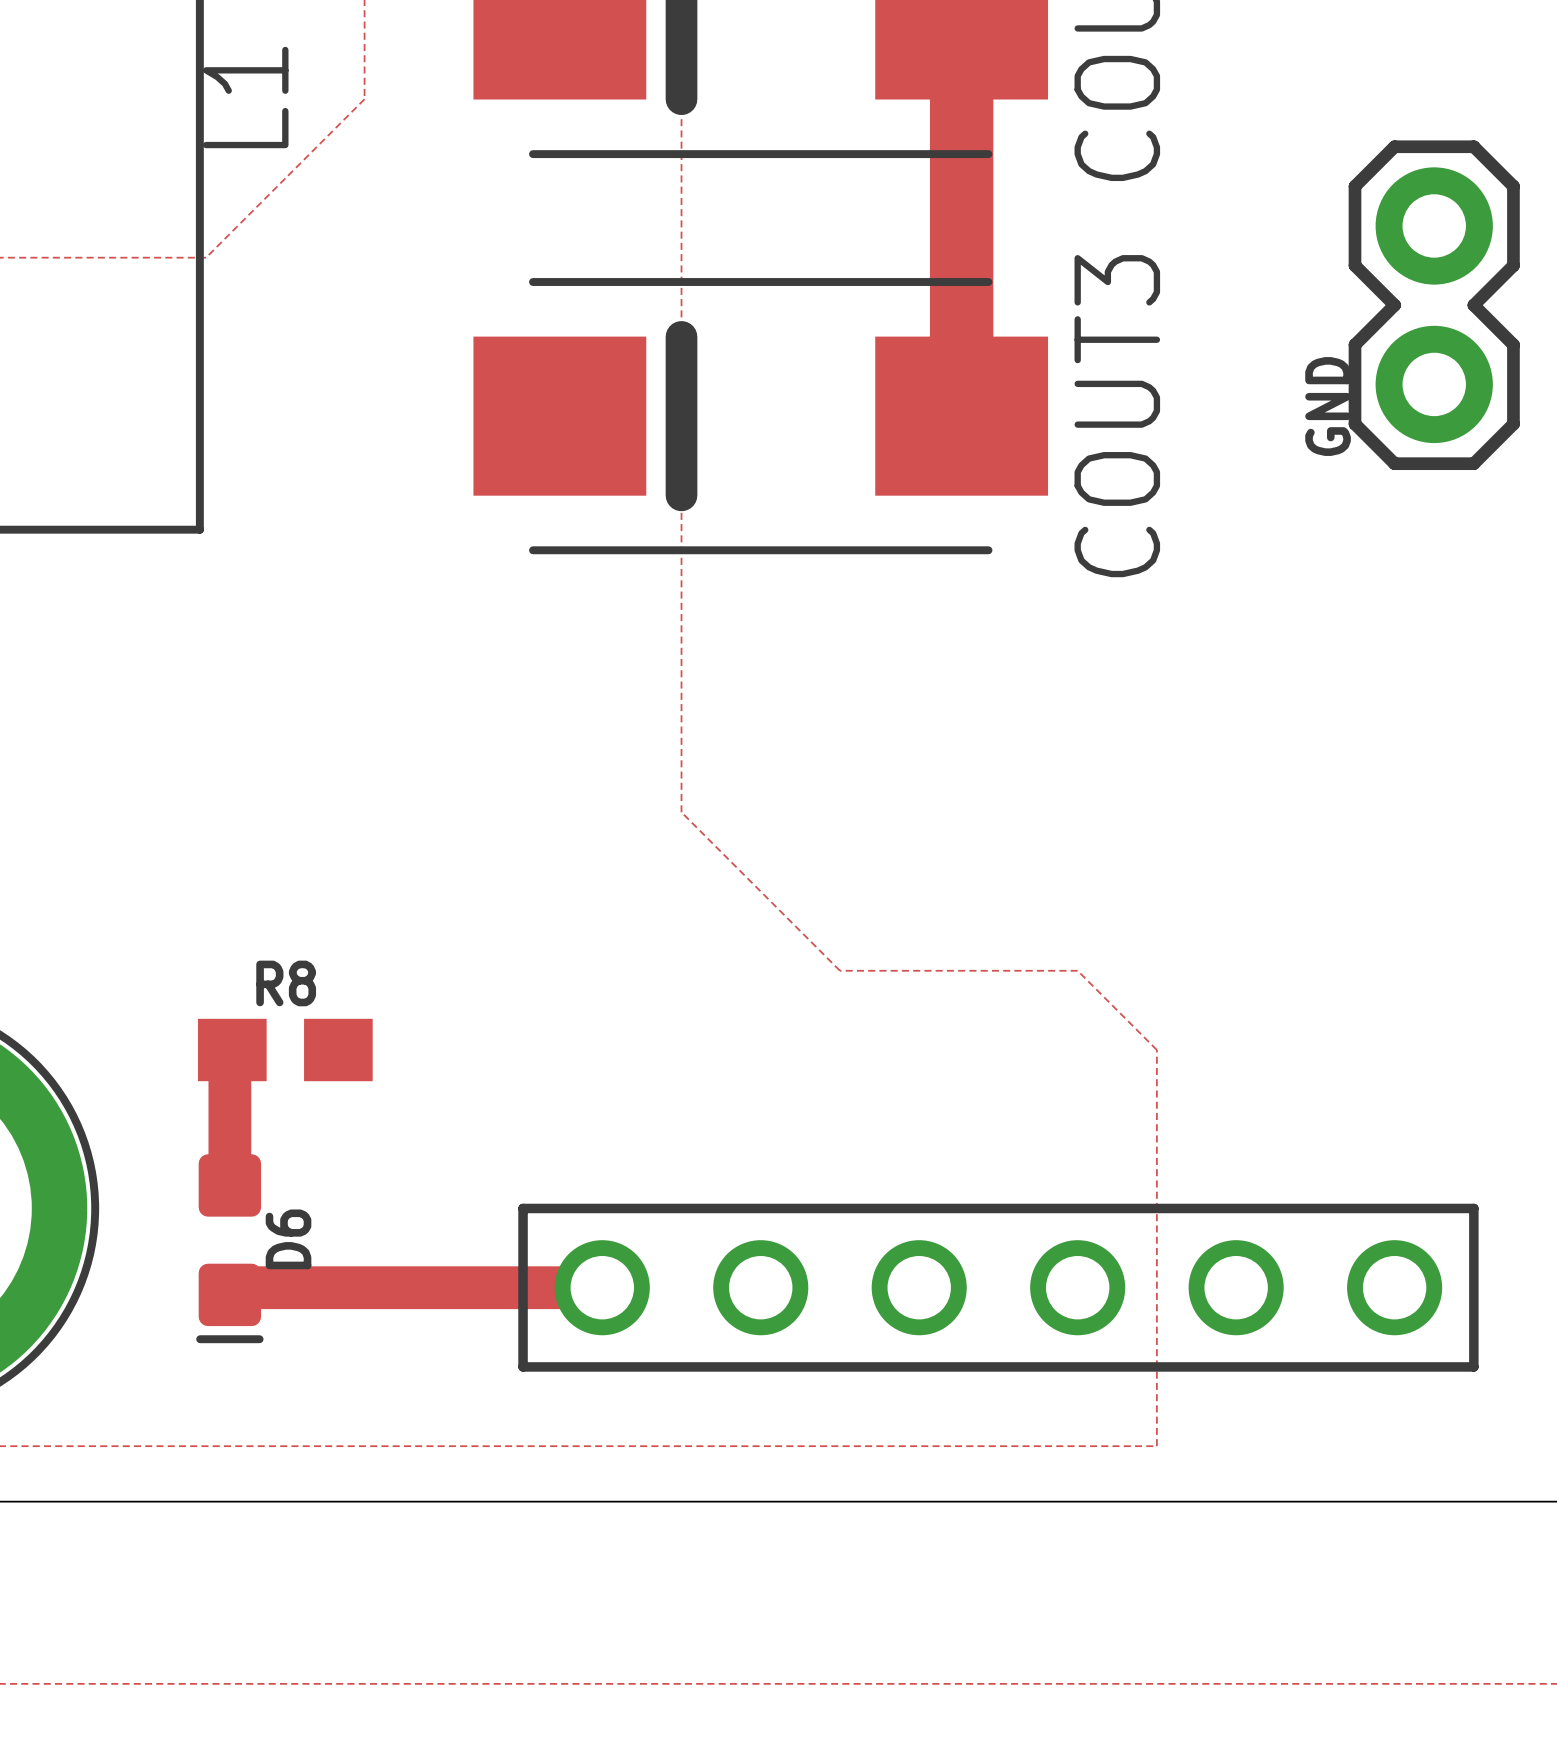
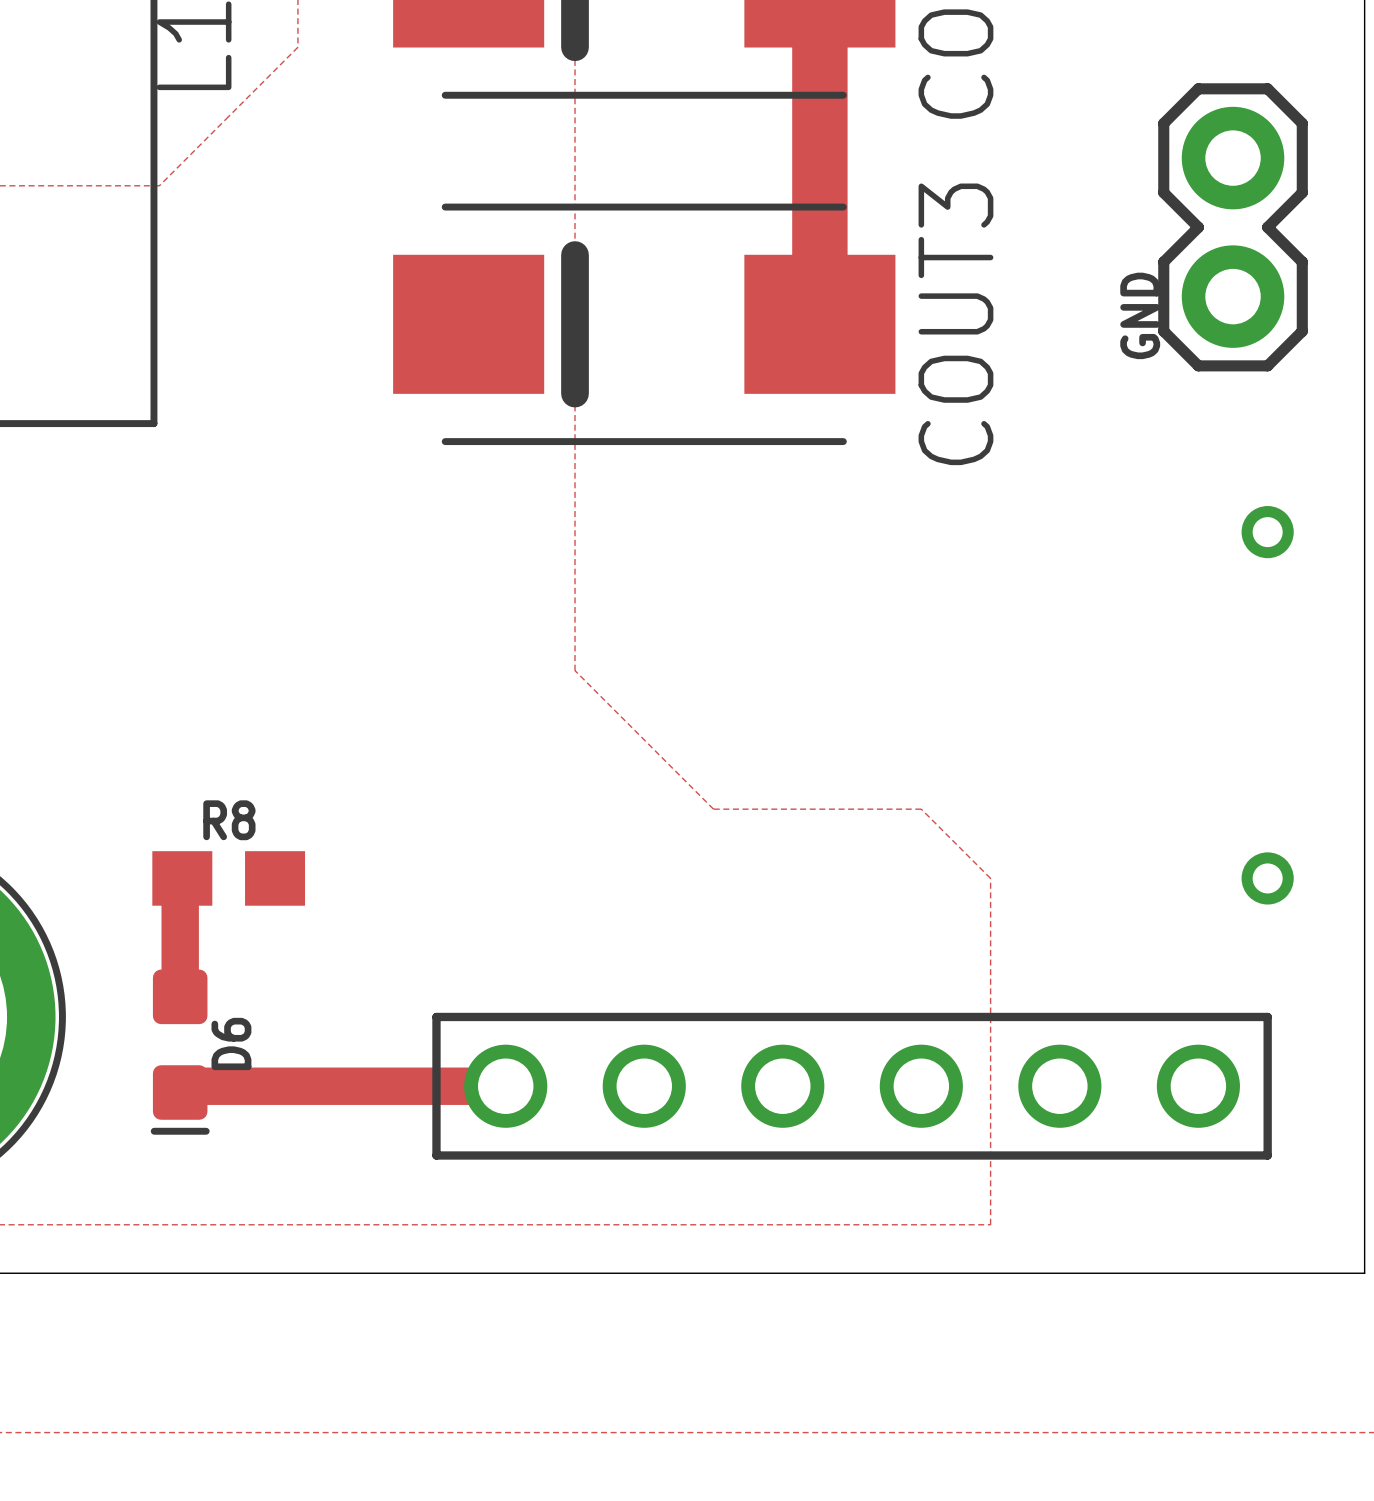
via: none -> (1267, 532)
via: none -> (1267, 878)

